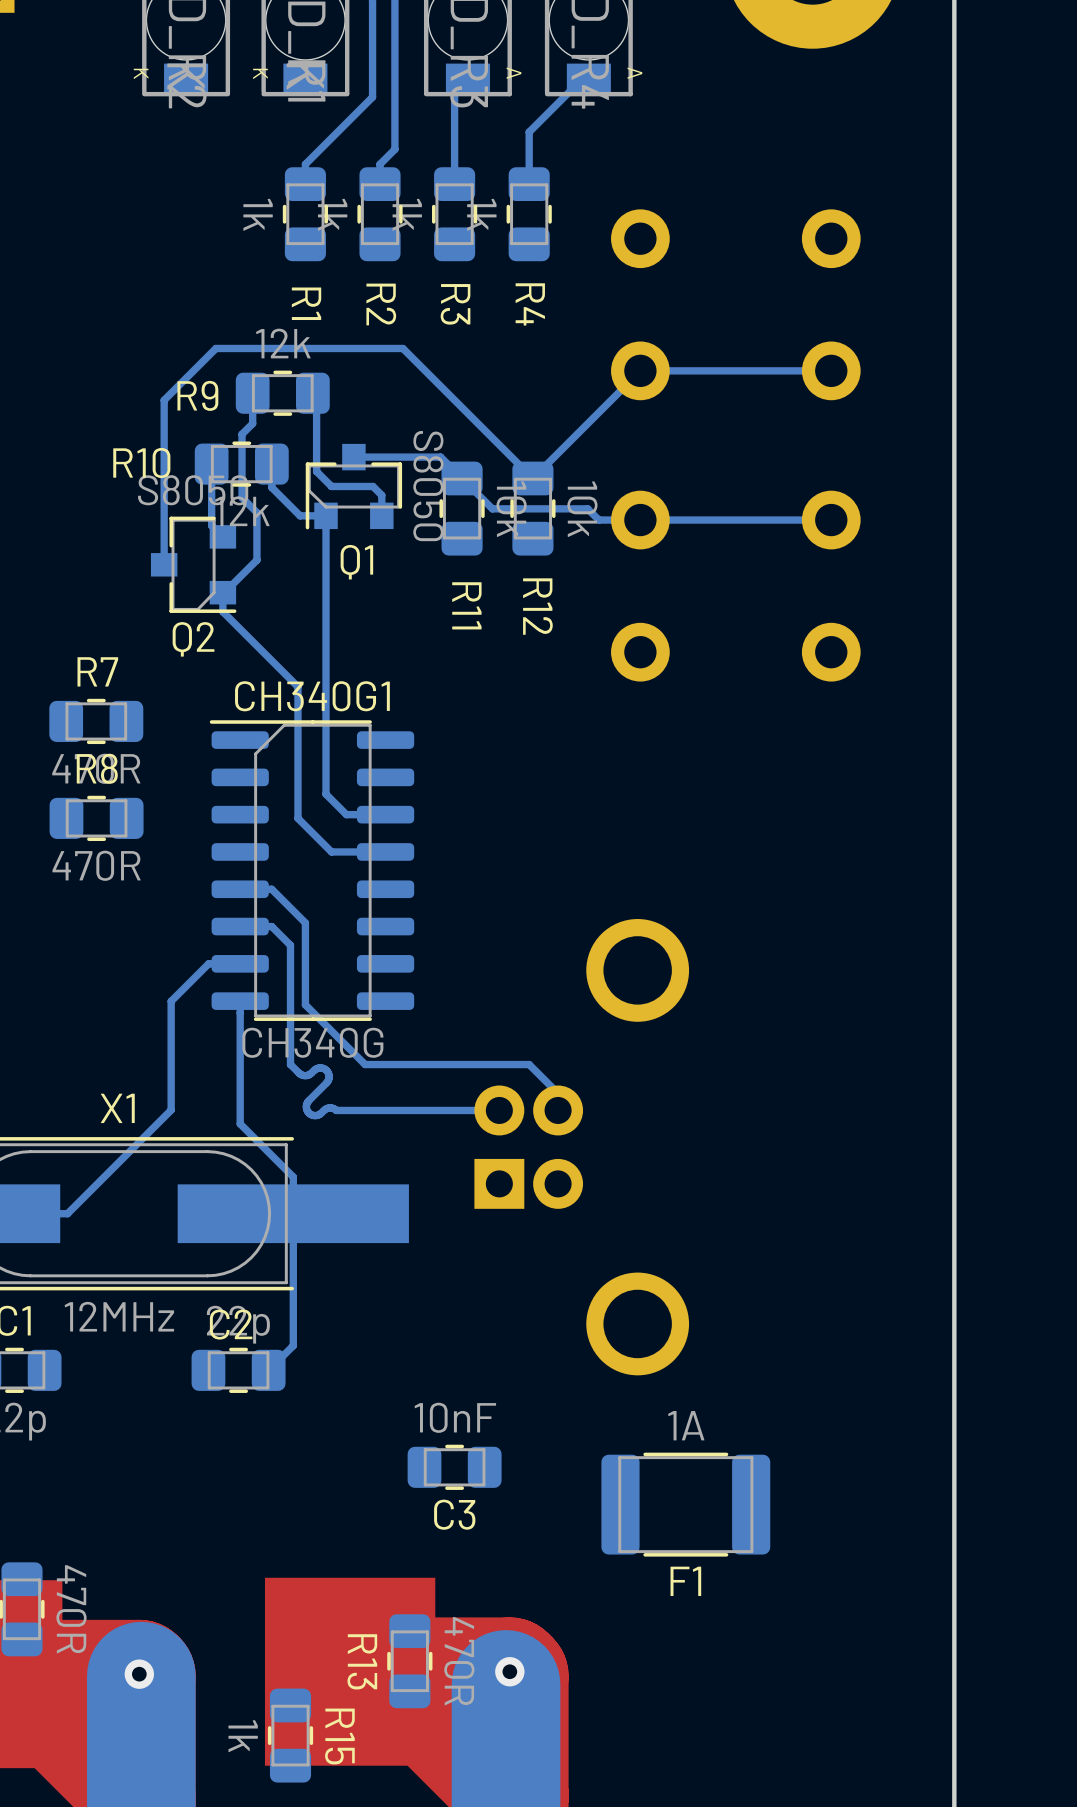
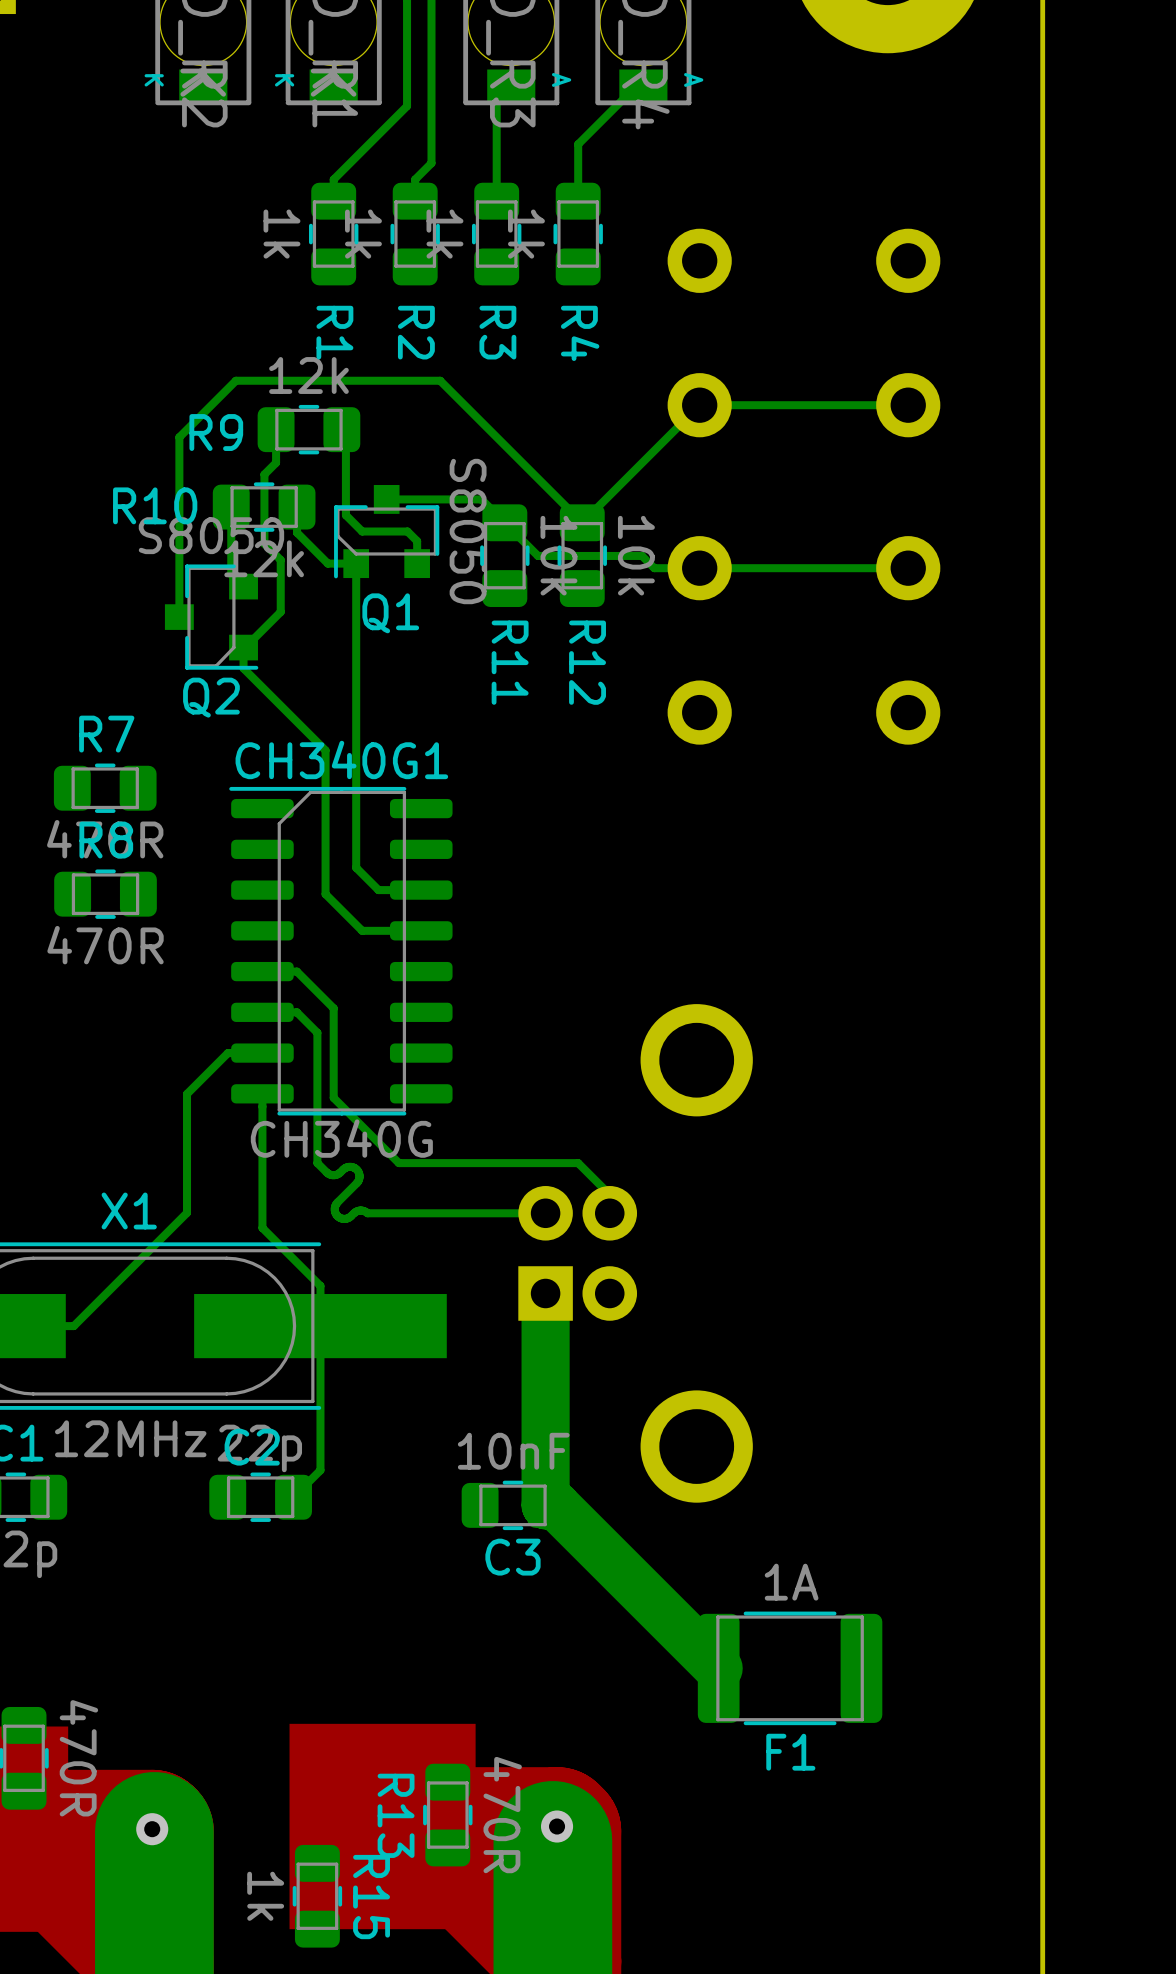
bottom track: none -> (545, 1293) (545, 1505)
bottom track: none -> (545, 1505) (555, 1505) (718, 1668)
C3 position: (454, 1467) -> (512, 1505)
F1 position: (685, 1504) -> (790, 1668)

